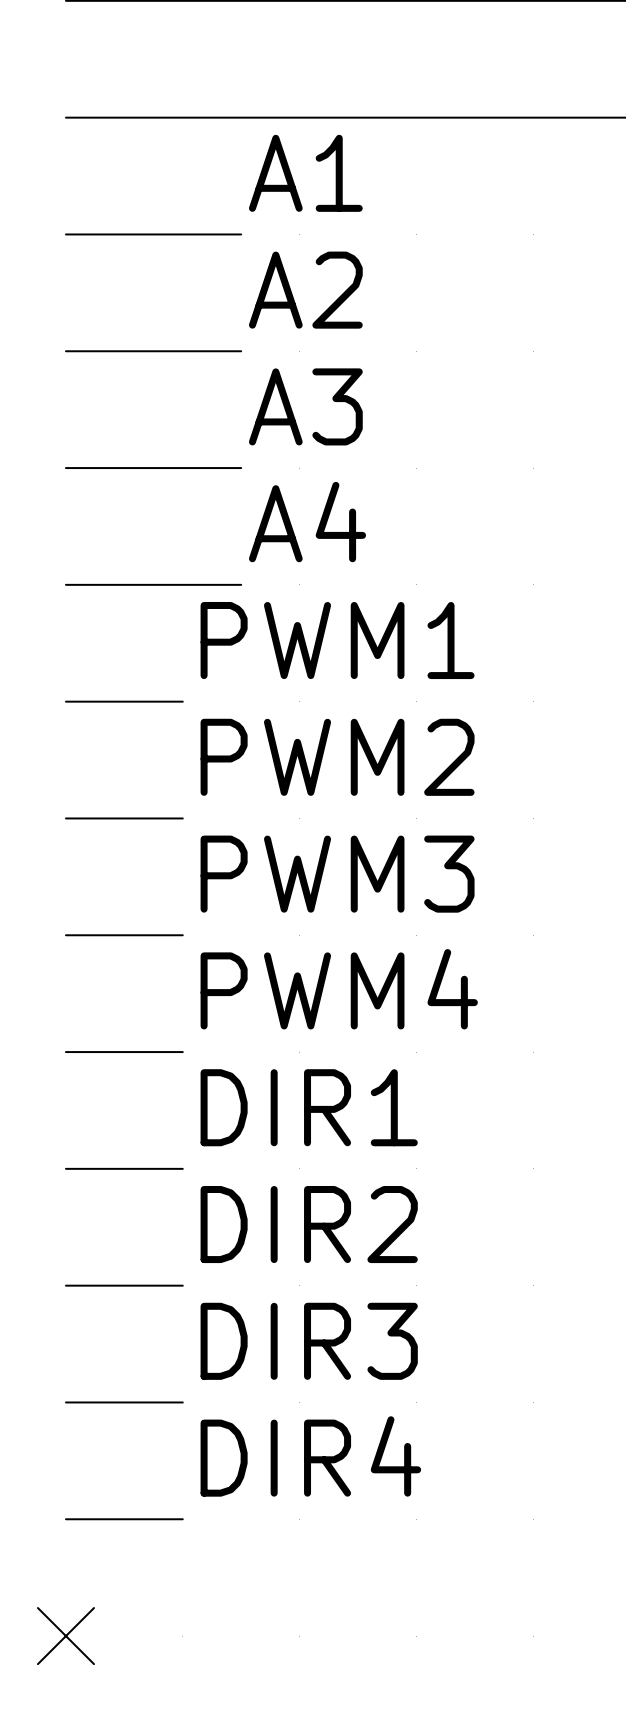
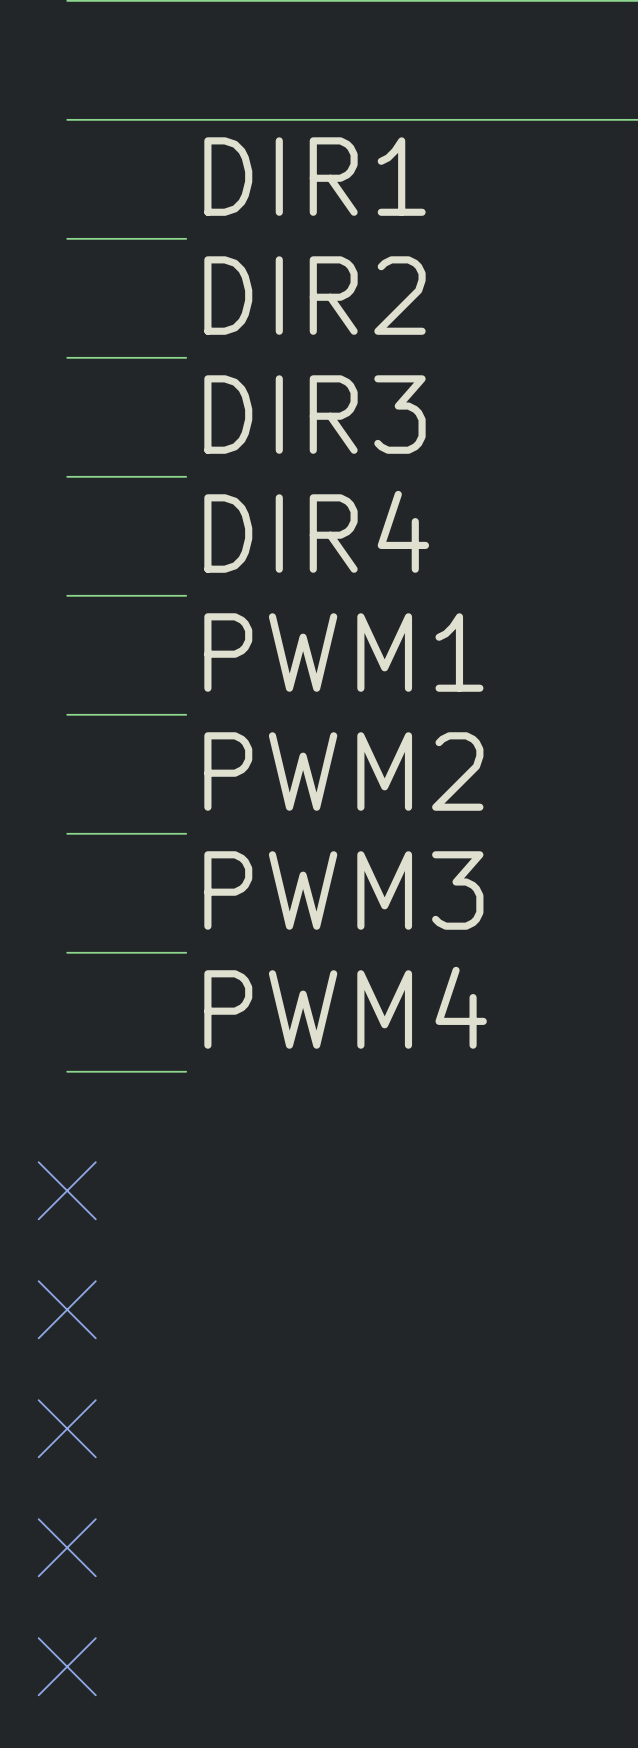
label: A1 (305, 173) -> none
wire: (182, 234) (241, 234) -> none
label: A2 (305, 290) -> none
wire: (182, 351) (241, 351) -> none
label: A3 (305, 406) -> none
wire: (182, 468) (241, 468) -> none
label: A4 (307, 522) -> none
wire: (182, 584) (241, 584) -> none
label position: DIR1 (309, 1107) -> DIR1 (314, 176)
wire: (65, 1168) (182, 1168) -> none
no-connect mark: none -> (67, 1190)
label position: DIR2 (309, 1224) -> DIR2 (314, 295)
wire: (65, 1285) (182, 1285) -> none
no-connect mark: none -> (67, 1309)
label position: DIR3 (309, 1341) -> DIR3 (314, 414)
wire: (65, 1402) (182, 1402) -> none
no-connect mark: none -> (67, 1428)
label position: DIR4 (310, 1456) -> DIR4 (316, 531)
wire: (65, 1519) (182, 1519) -> none
no-connect mark: none -> (67, 1547)

